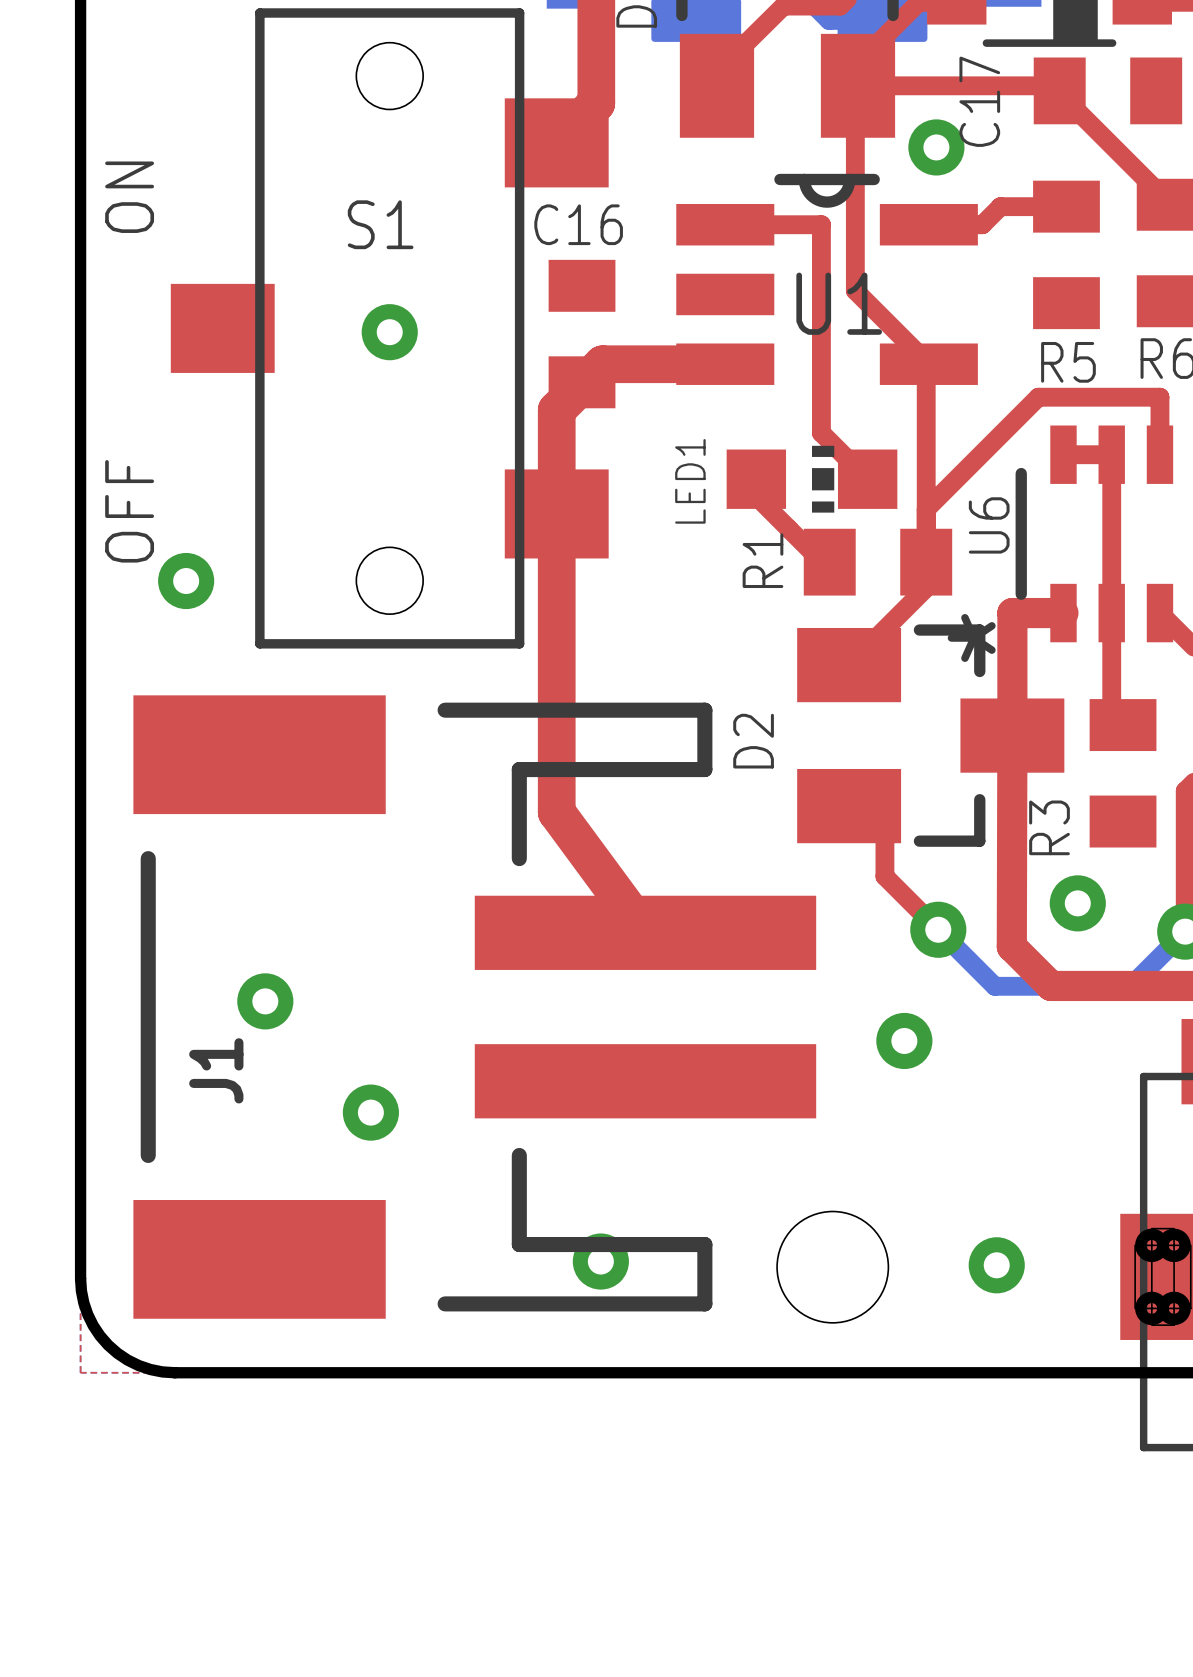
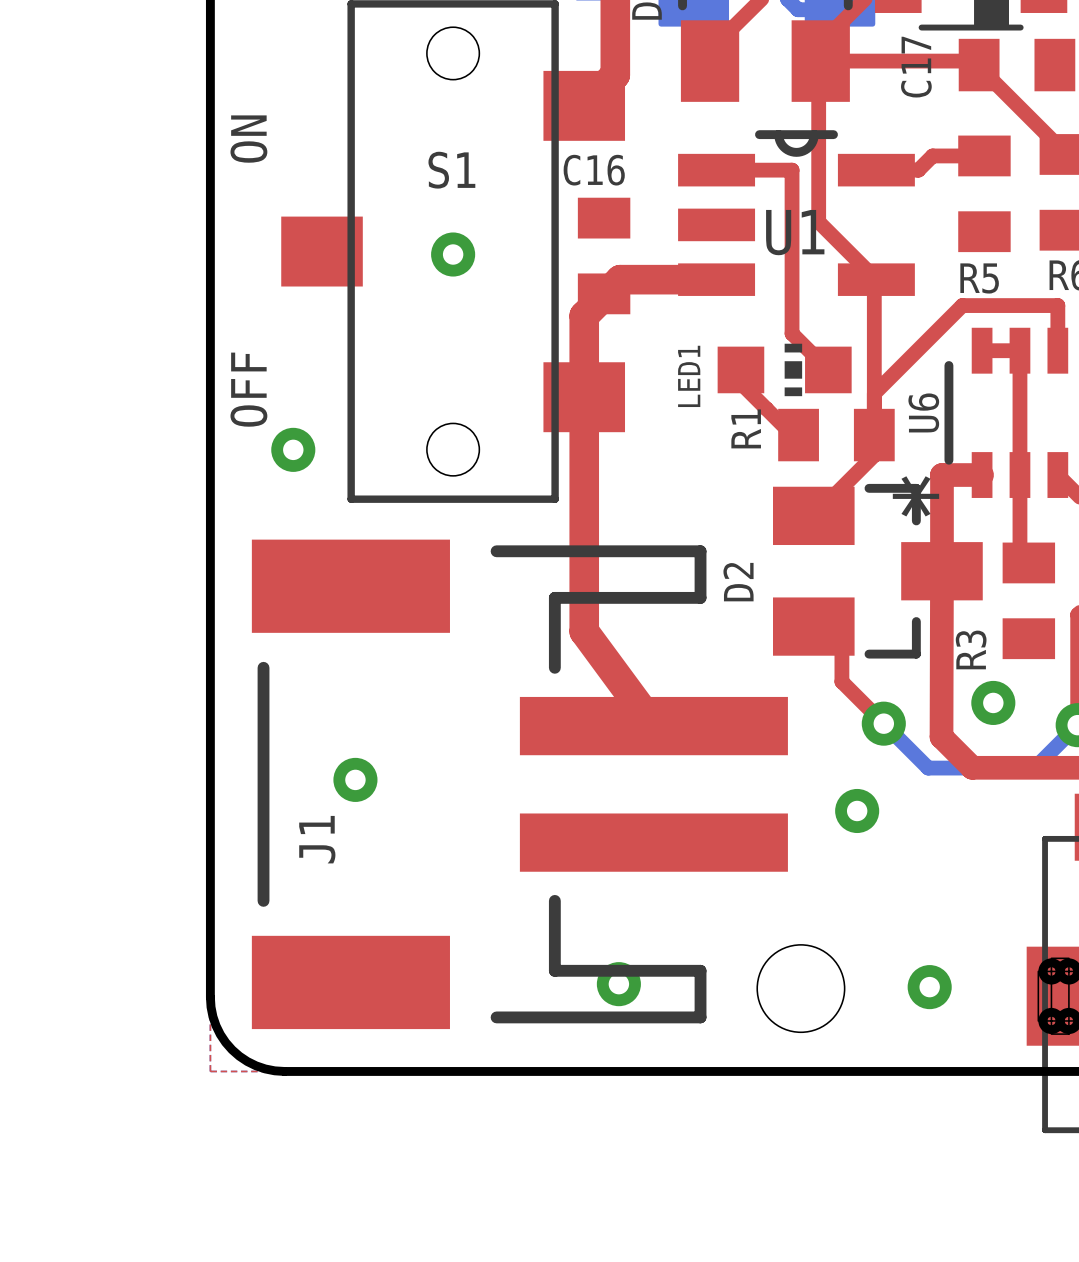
via: (936, 147) -> none
via: (370, 1112) -> none

